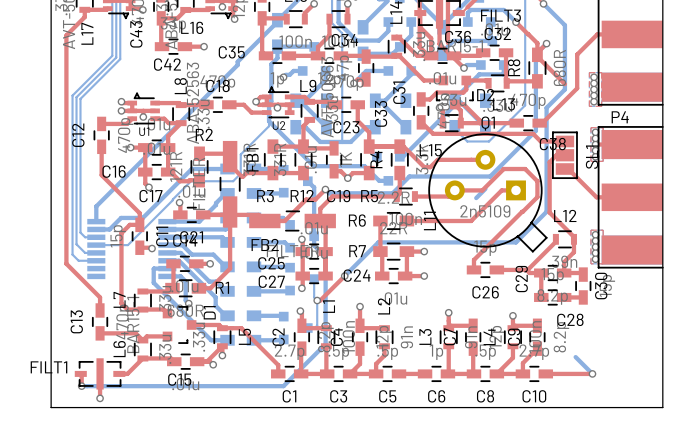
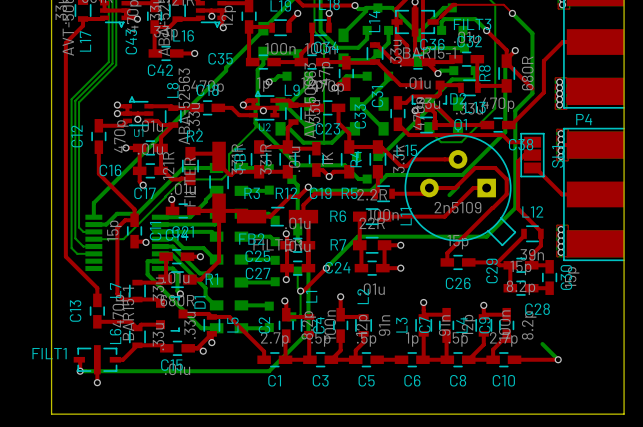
board edge: (51, 407) (662, 407) -> (51, 391) (51, 414) (624, 414) (624, 391)

